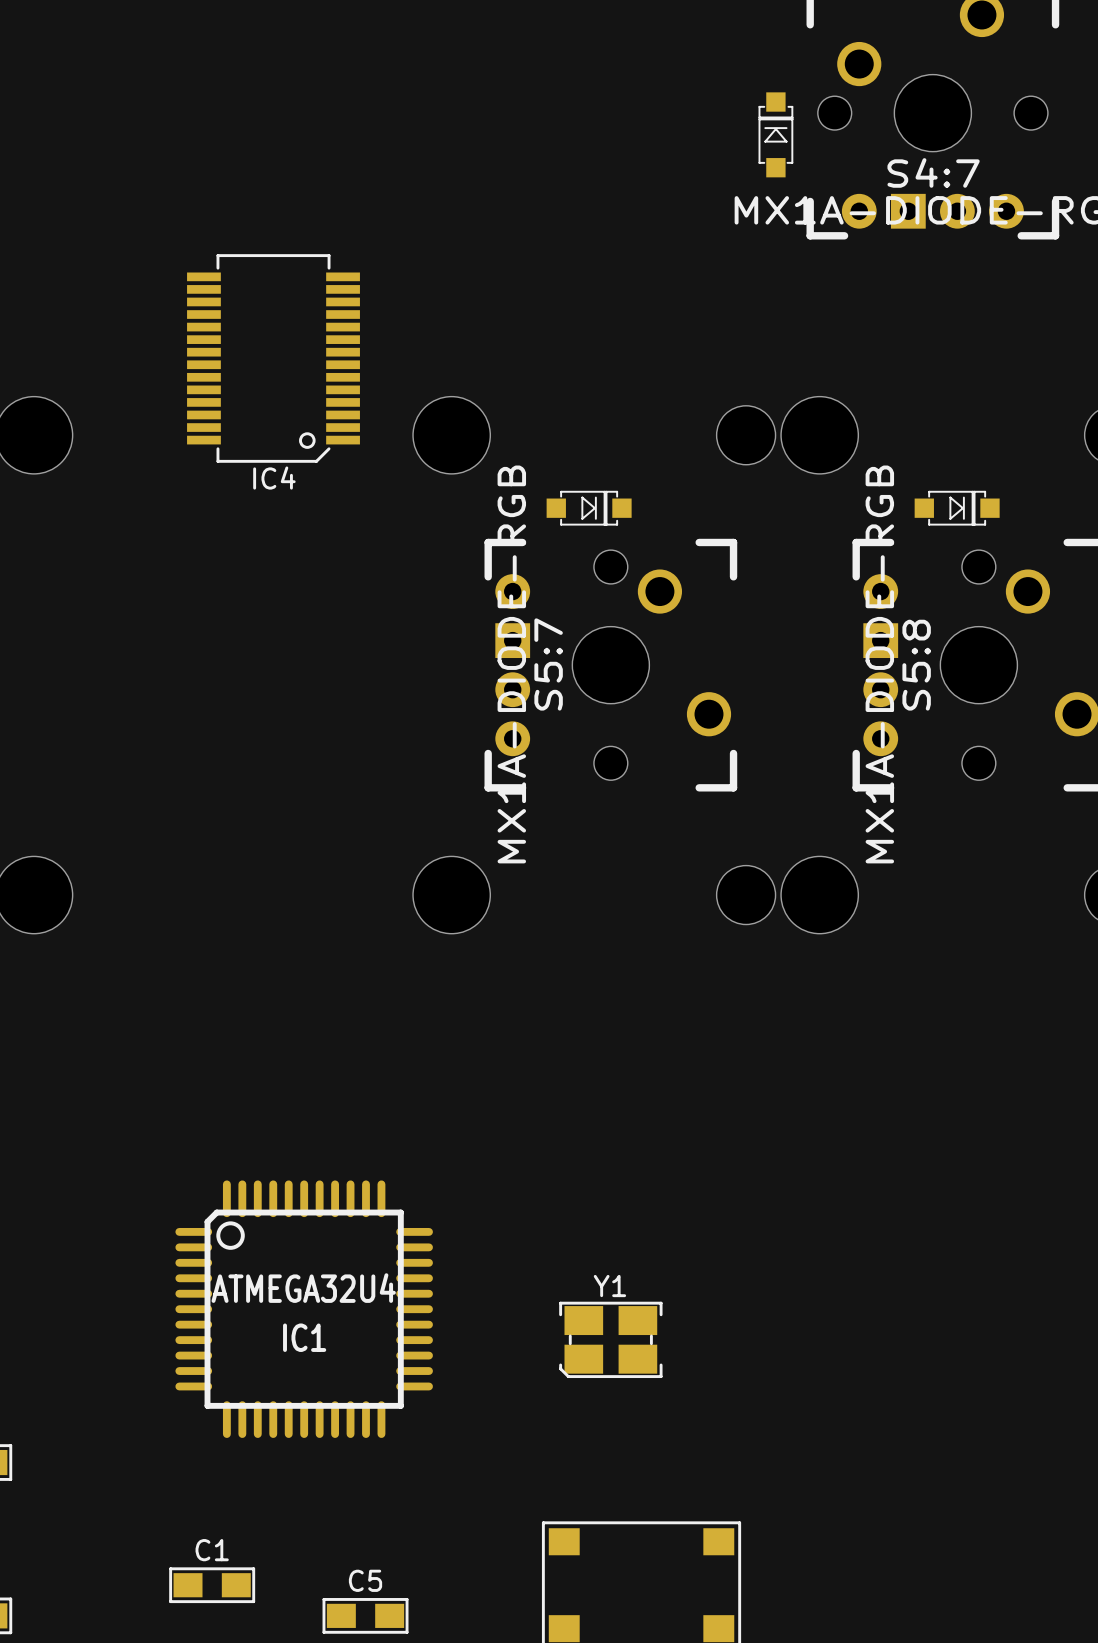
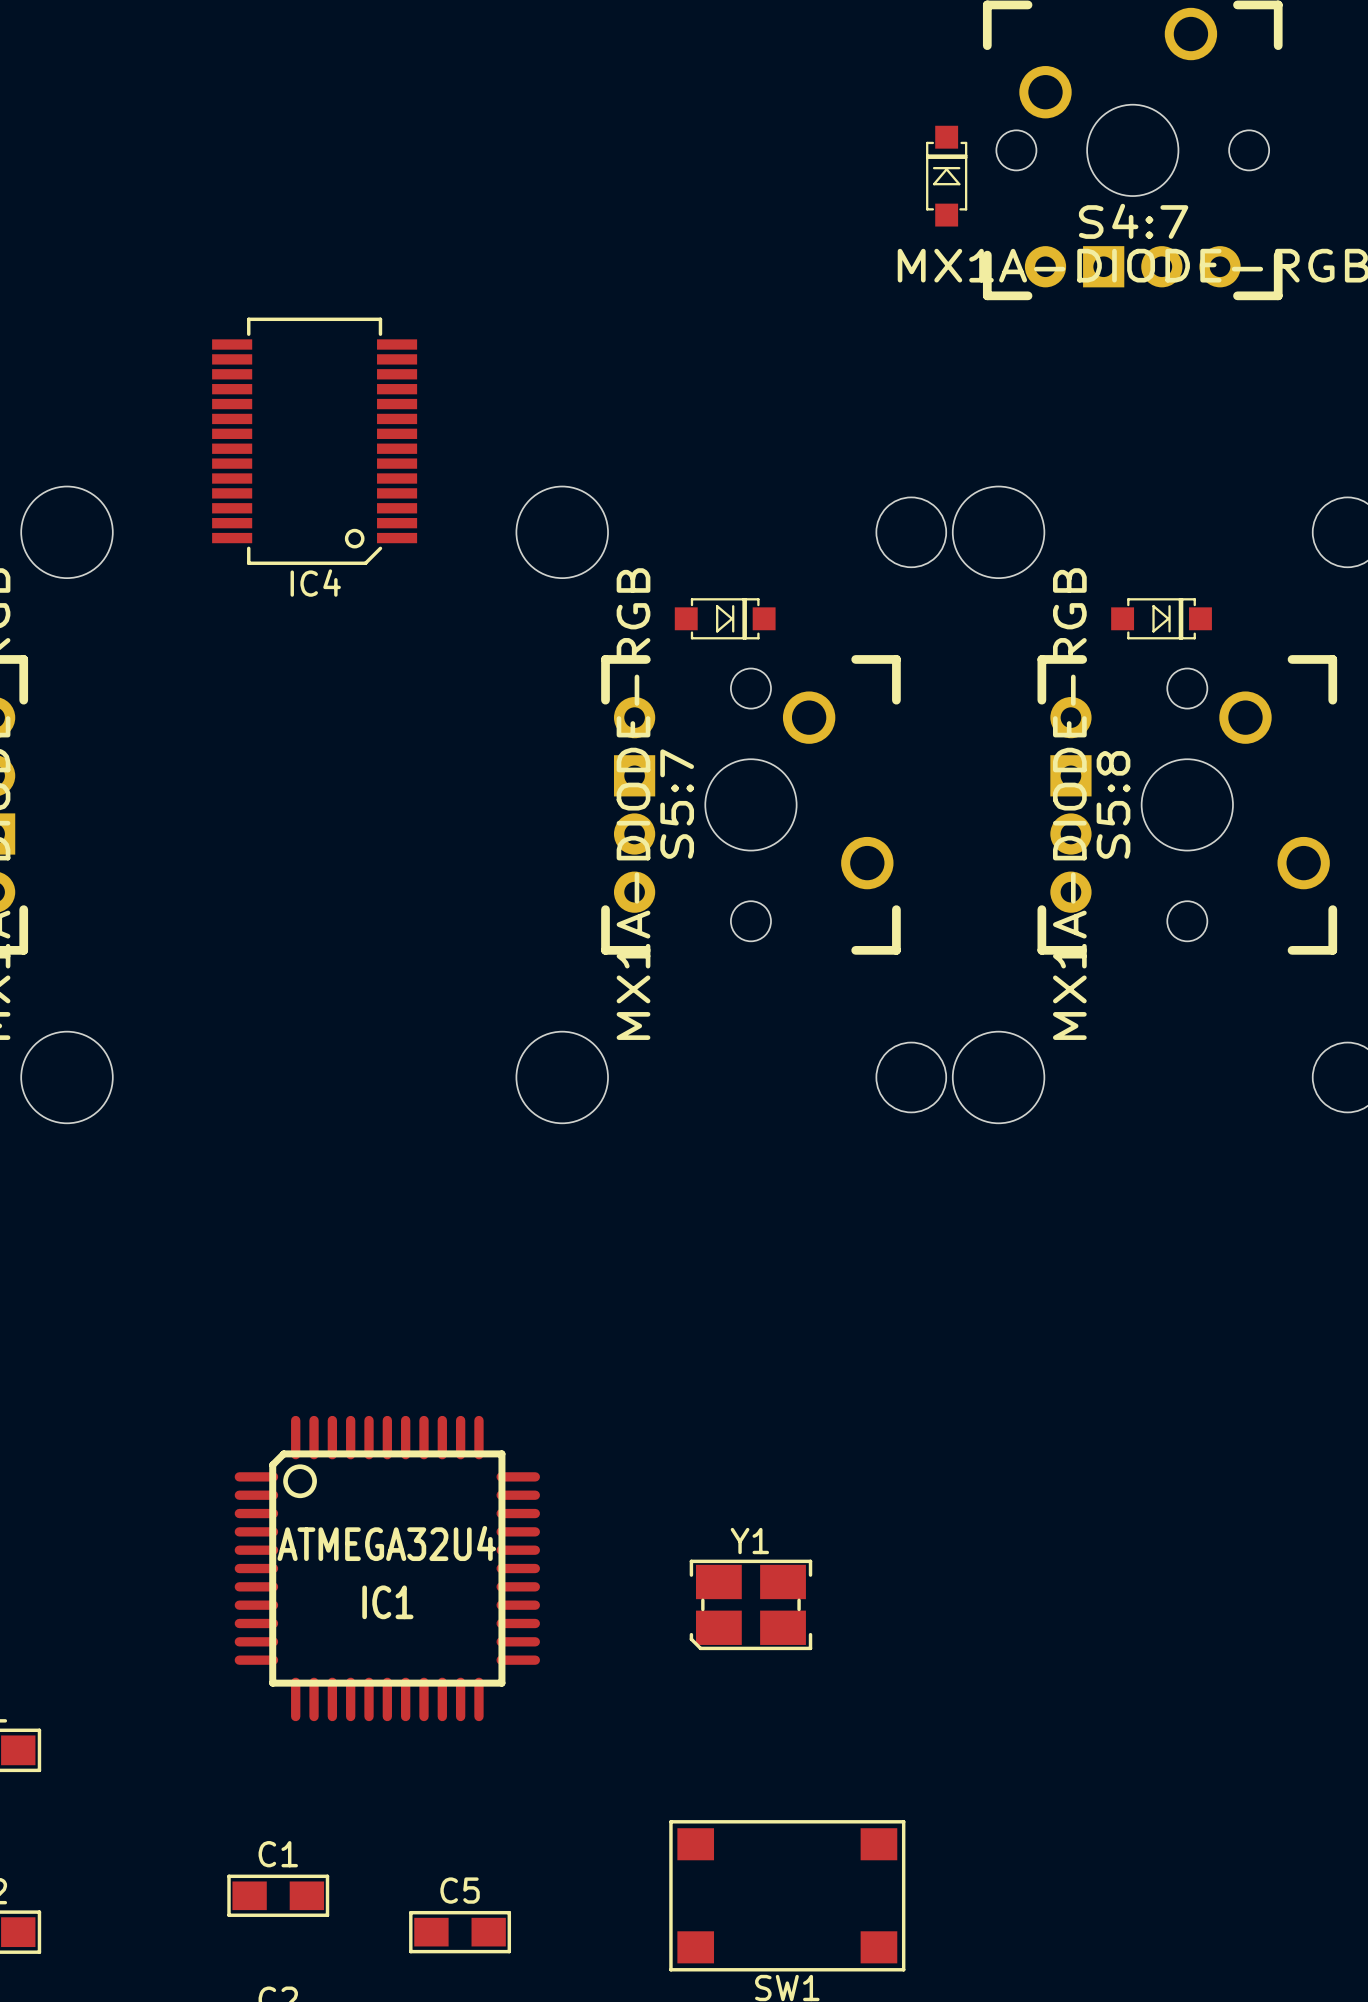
IC4 position: (273, 358) -> (314, 441)

